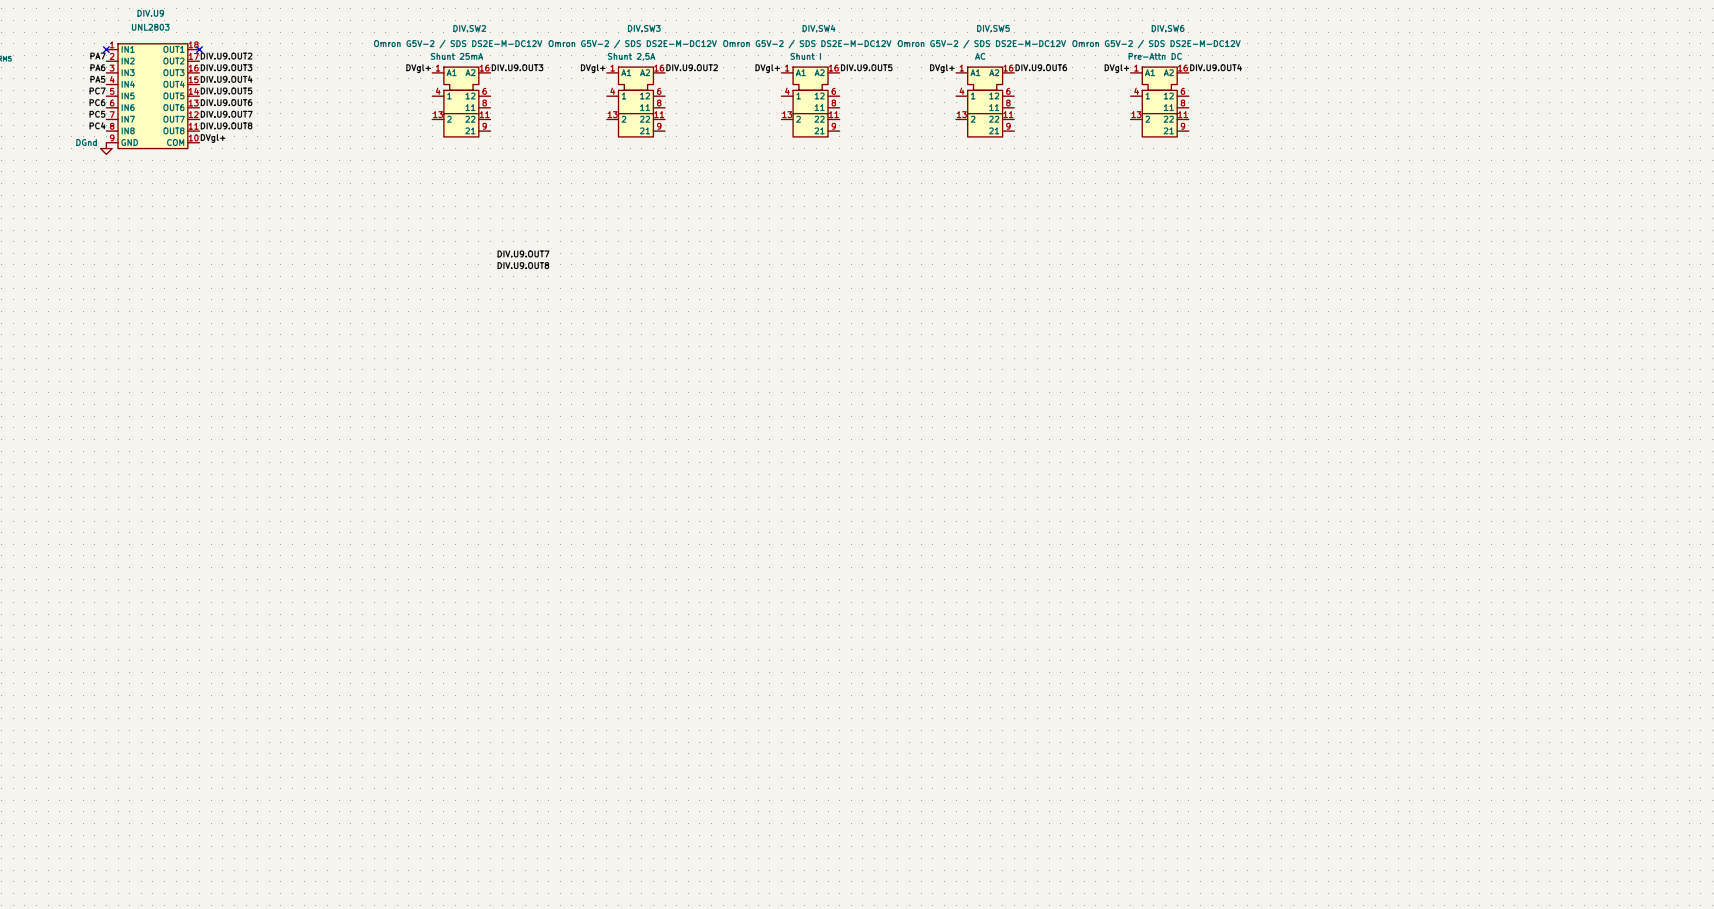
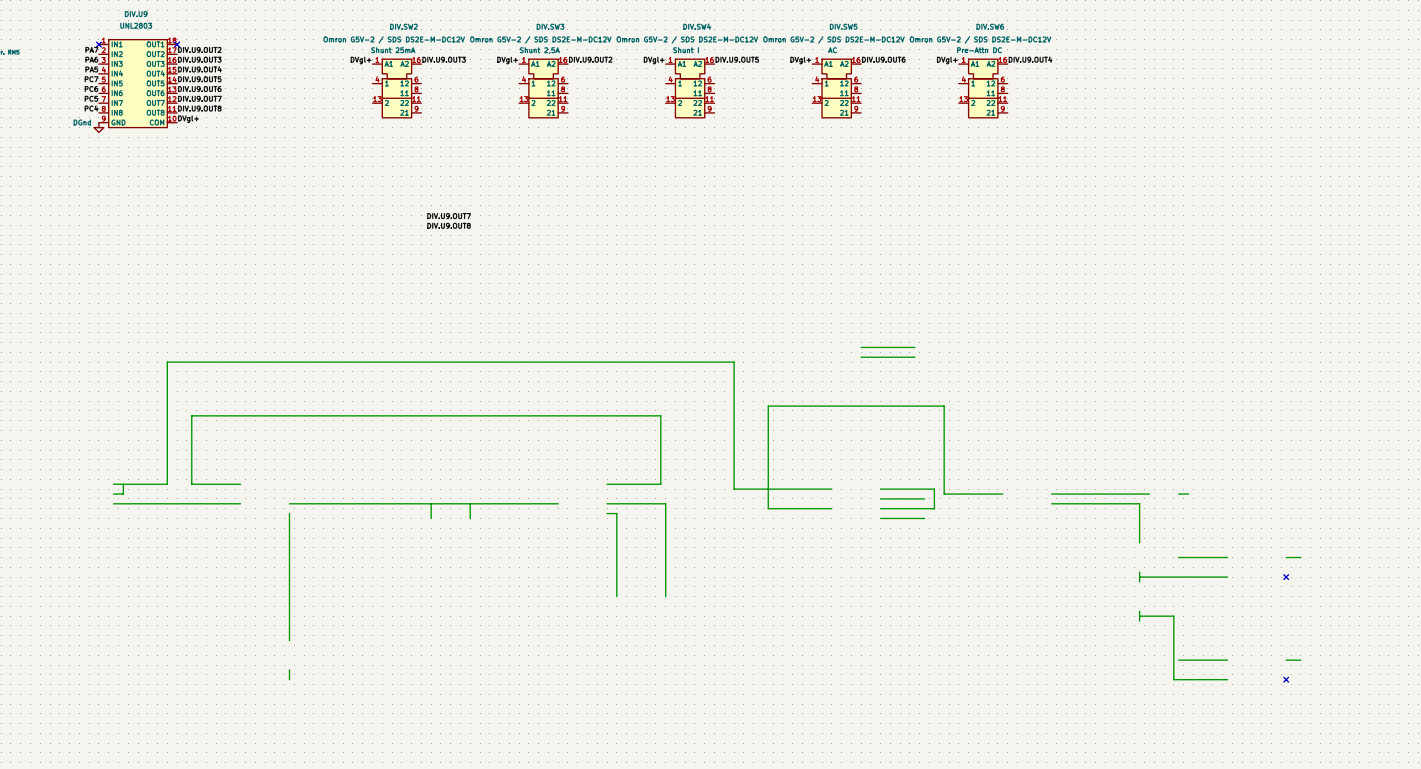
wire: none -> (861, 347) (914, 347)
wire: none -> (861, 357) (914, 357)
wire: none -> (113, 484) (167, 484) (167, 362) (734, 362) (734, 489) (831, 489)
wire: none -> (123, 484) (123, 494) (113, 494)
wire: none -> (240, 484) (191, 484) (191, 415) (660, 415) (660, 484) (607, 484)
wire: none -> (880, 489) (934, 489) (934, 508) (880, 508)
wire: none -> (1002, 494) (944, 494) (944, 406) (768, 406) (768, 508) (831, 508)
wire: none -> (1051, 494) (1149, 494)
wire: none -> (1178, 494) (1188, 494)
wire: none -> (880, 498) (924, 498)
wire: none -> (113, 503) (240, 503)
wire: none -> (289, 503) (558, 503)
wire: none -> (431, 503) (431, 518)
wire: none -> (470, 503) (470, 518)
wire: none -> (607, 503) (665, 503) (665, 596)
wire: none -> (1051, 503) (1139, 503) (1139, 542)
wire: none -> (289, 513) (289, 640)
wire: none -> (607, 513) (616, 513) (616, 596)
wire: none -> (880, 518) (924, 518)
wire: none -> (1178, 557) (1227, 557)
wire: none -> (1286, 557) (1300, 557)
wire: none -> (1139, 572) (1139, 581)
wire: none -> (1139, 577) (1227, 577)
no-connect mark: none -> (1286, 577)
wire: none -> (1139, 611) (1139, 621)
wire: none -> (1139, 616) (1173, 616) (1173, 679) (1227, 679)
wire: none -> (1178, 660) (1227, 660)
wire: none -> (1286, 660) (1300, 660)
wire: none -> (289, 669) (289, 679)
no-connect mark: none -> (1286, 679)

